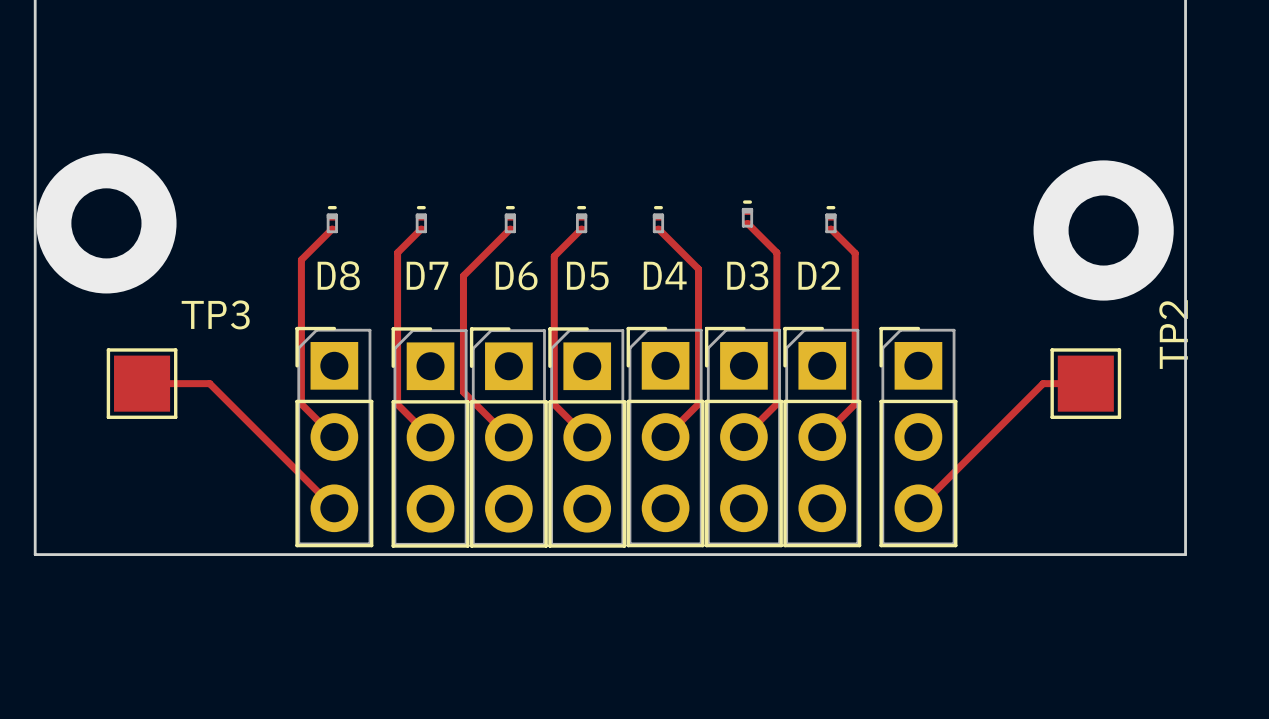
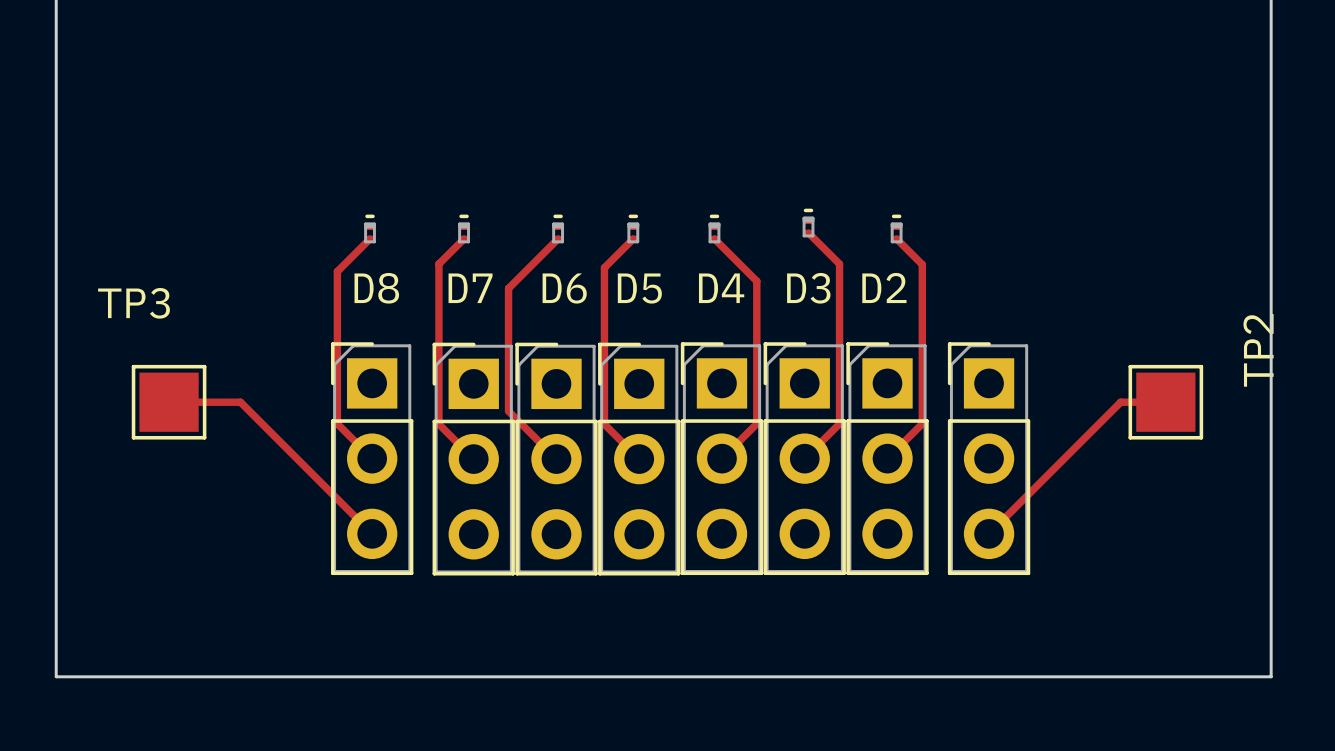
via: (106, 223) -> none
via: (1103, 230) -> none
TP3 name position: TP3 (215, 314) -> TP3 (134, 303)
board edge: (35, 554) (1185, 554) -> (56, 582) (56, 676) (1271, 676) (1271, 582)

